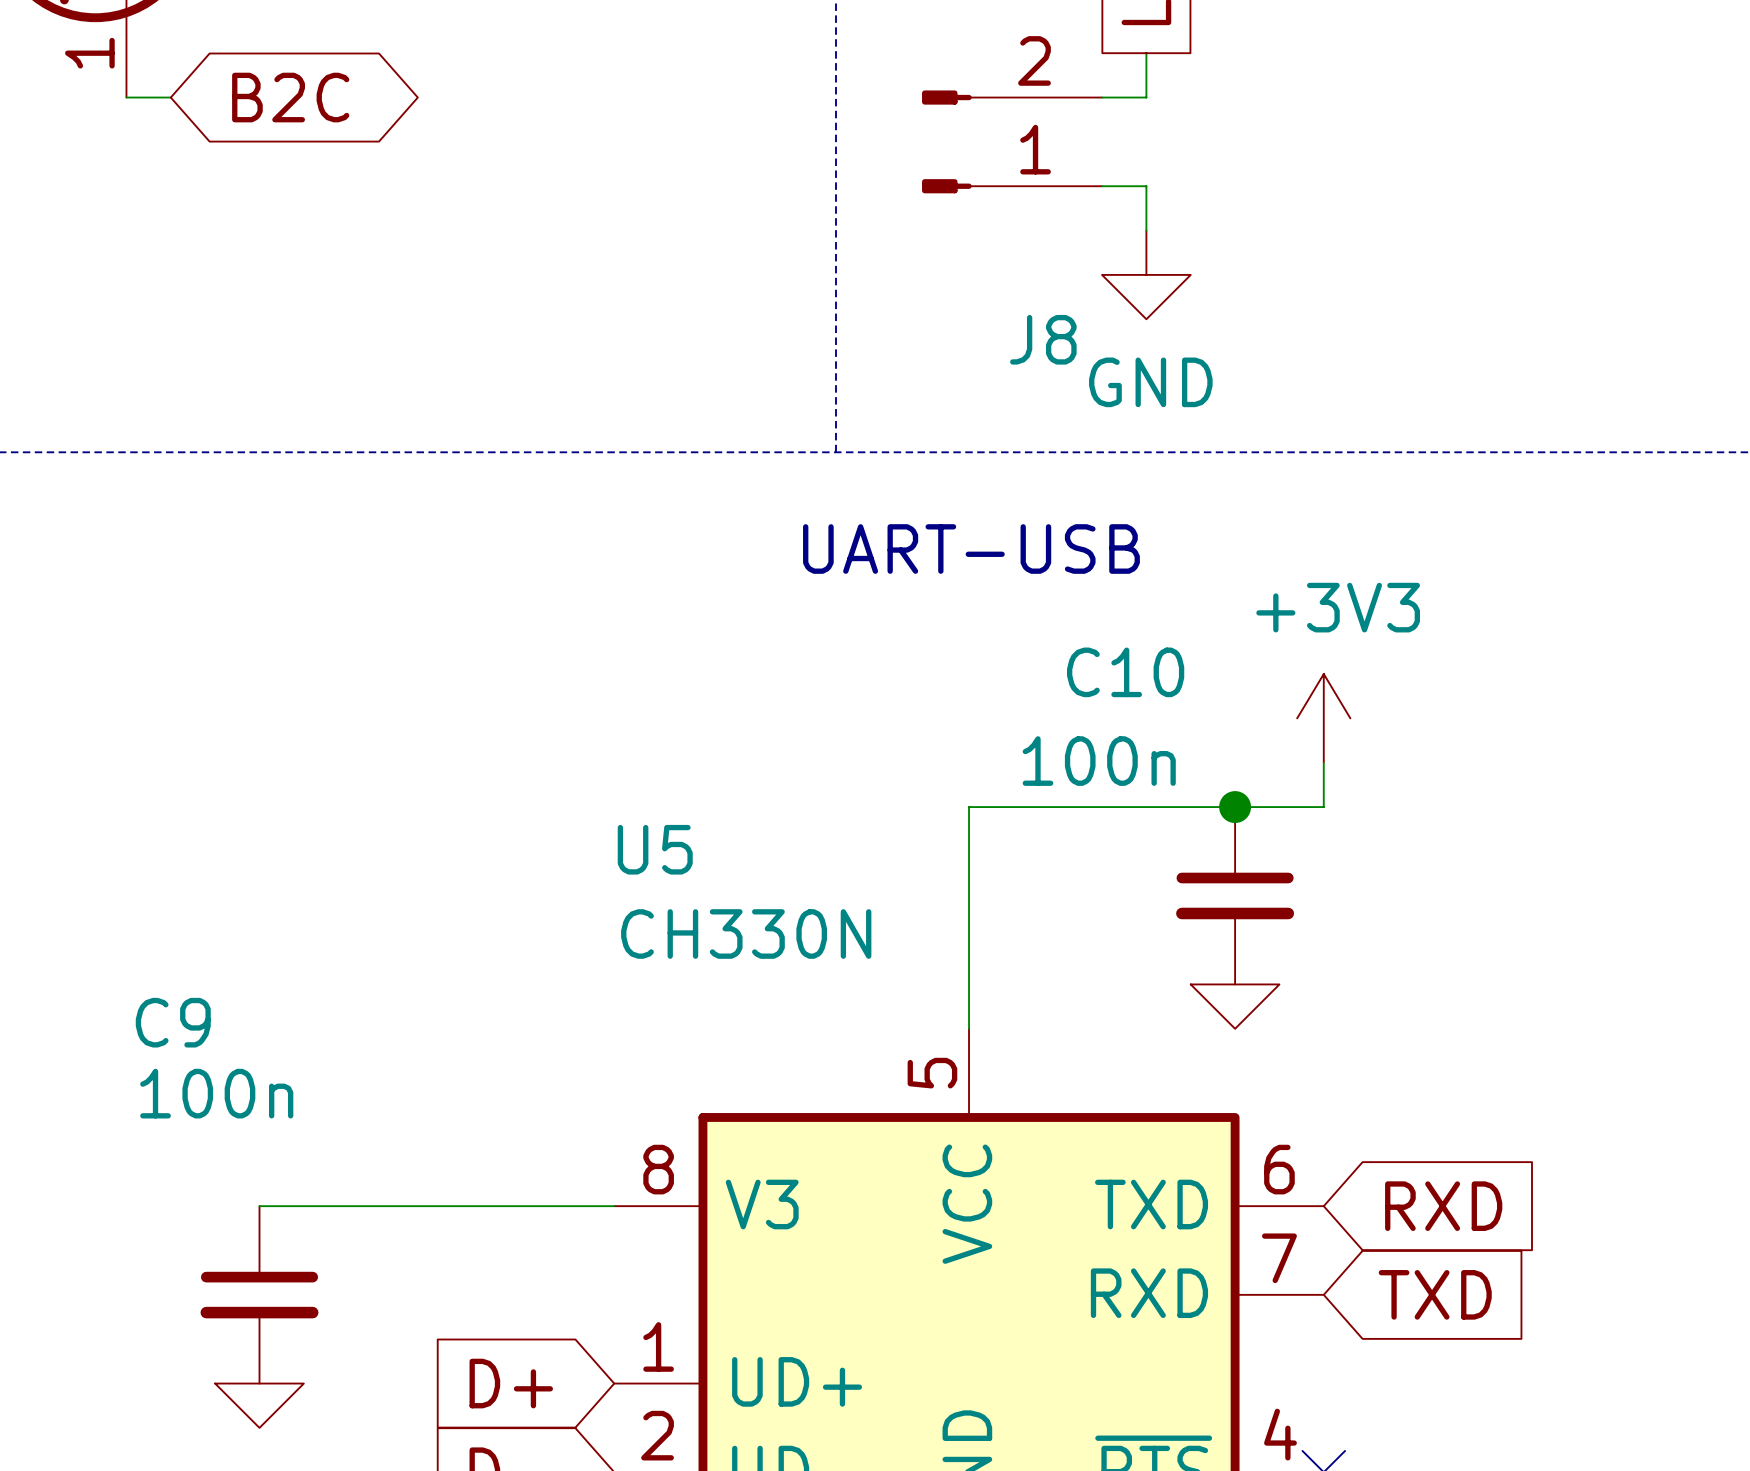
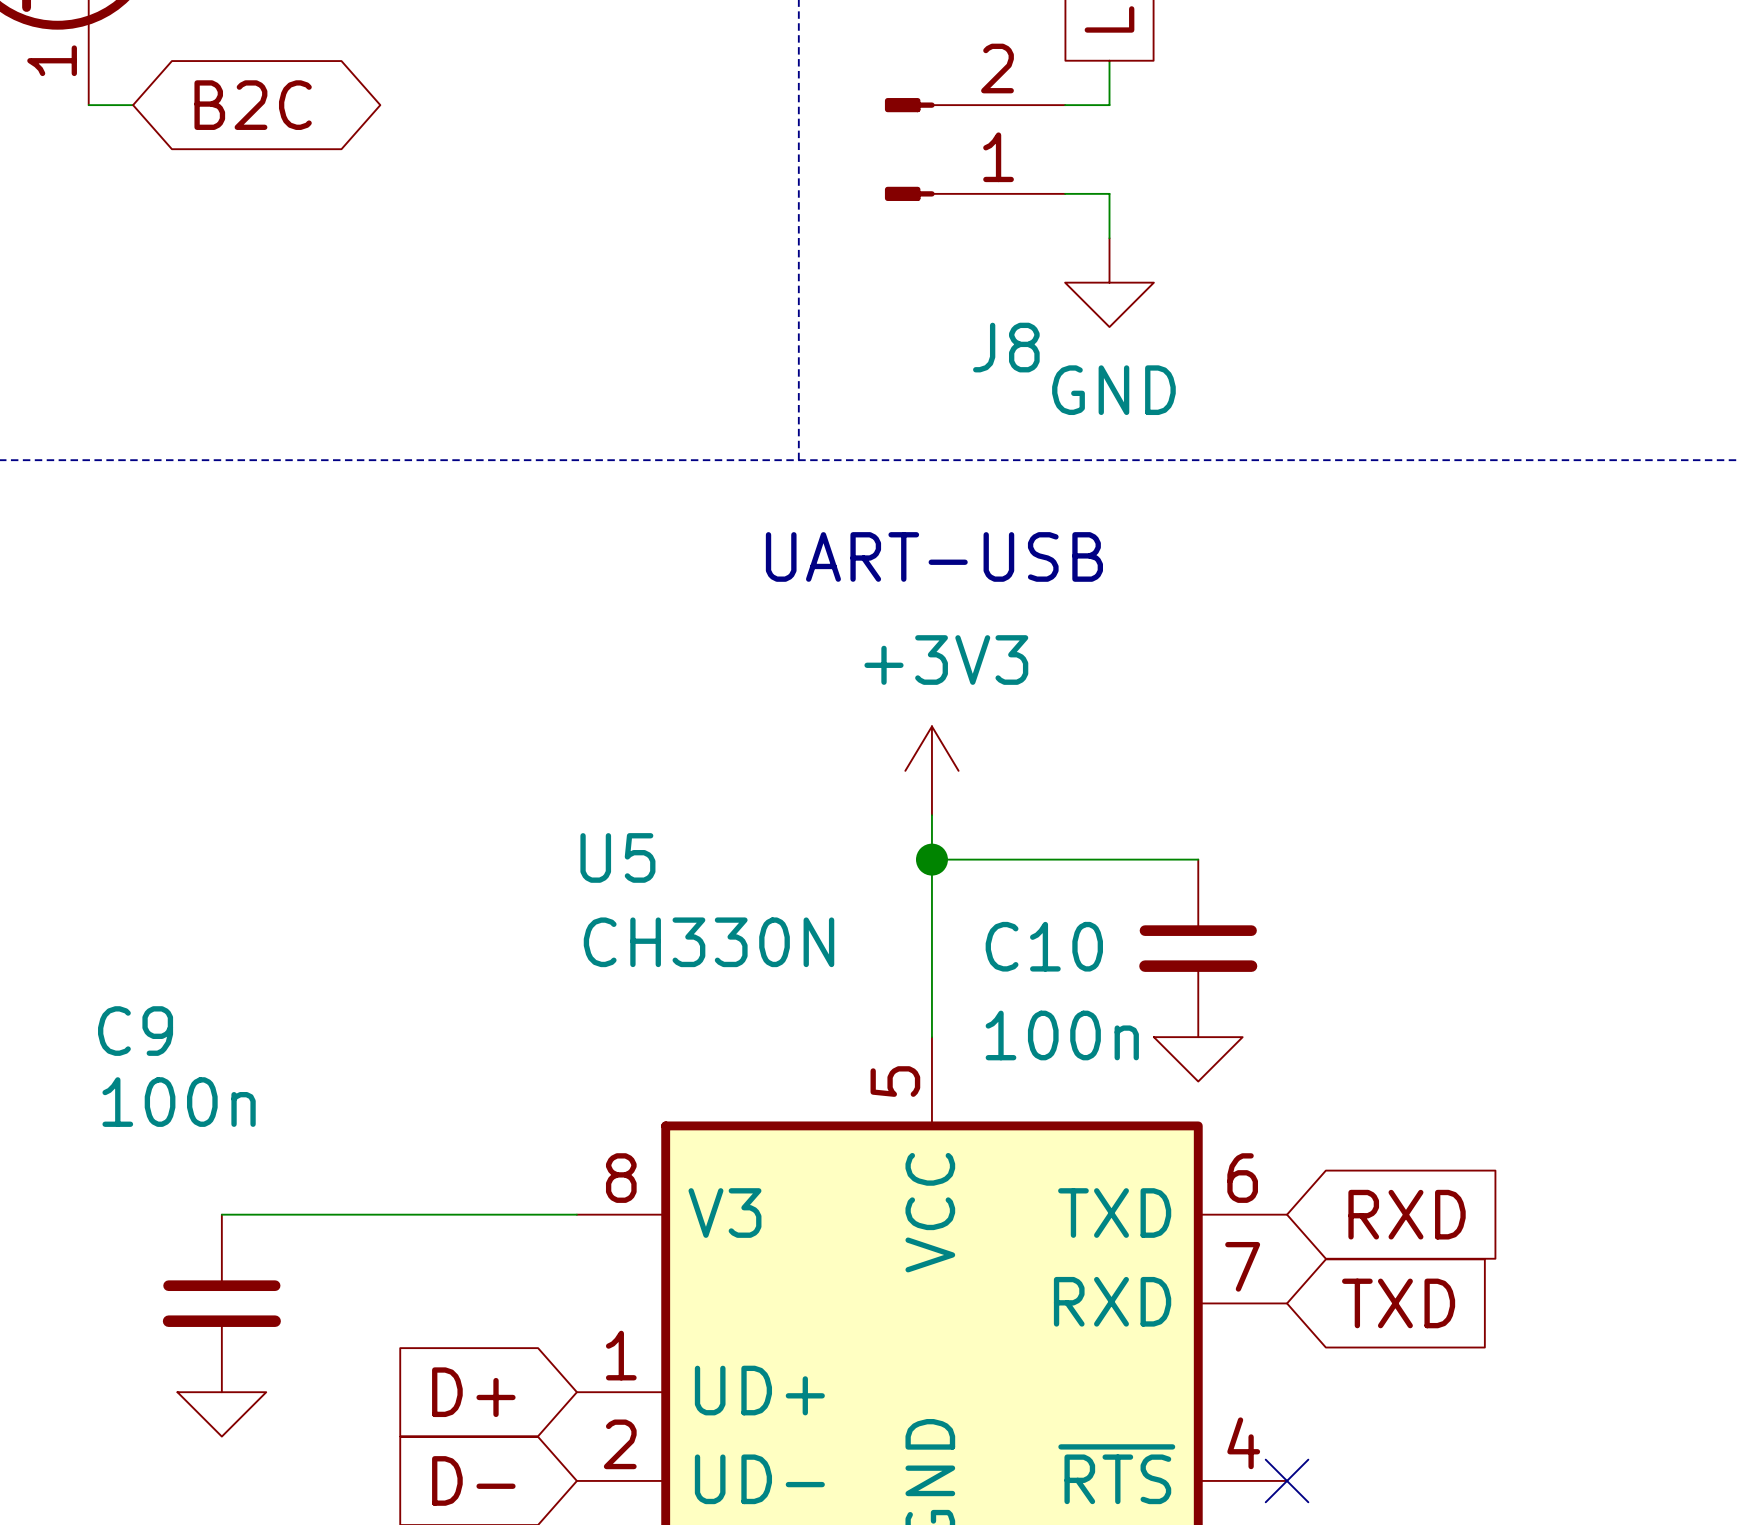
C10 name position: C10 (1125, 672) -> C10 (1044, 946)
power symbol position: +3V3 (1323, 718) -> +3V3 (931, 770)
C10 value position: 100n (1099, 761) -> 100n (1062, 1035)
wire: (1323, 762) (1323, 807) (969, 807) -> none
junction: (1235, 807) -> none
wire: none -> (931, 859) (1198, 859)
junction: none -> (931, 859)
C10 position: (1235, 895) -> (1198, 948)
power symbol position: (1235, 1006) -> (1198, 1059)

